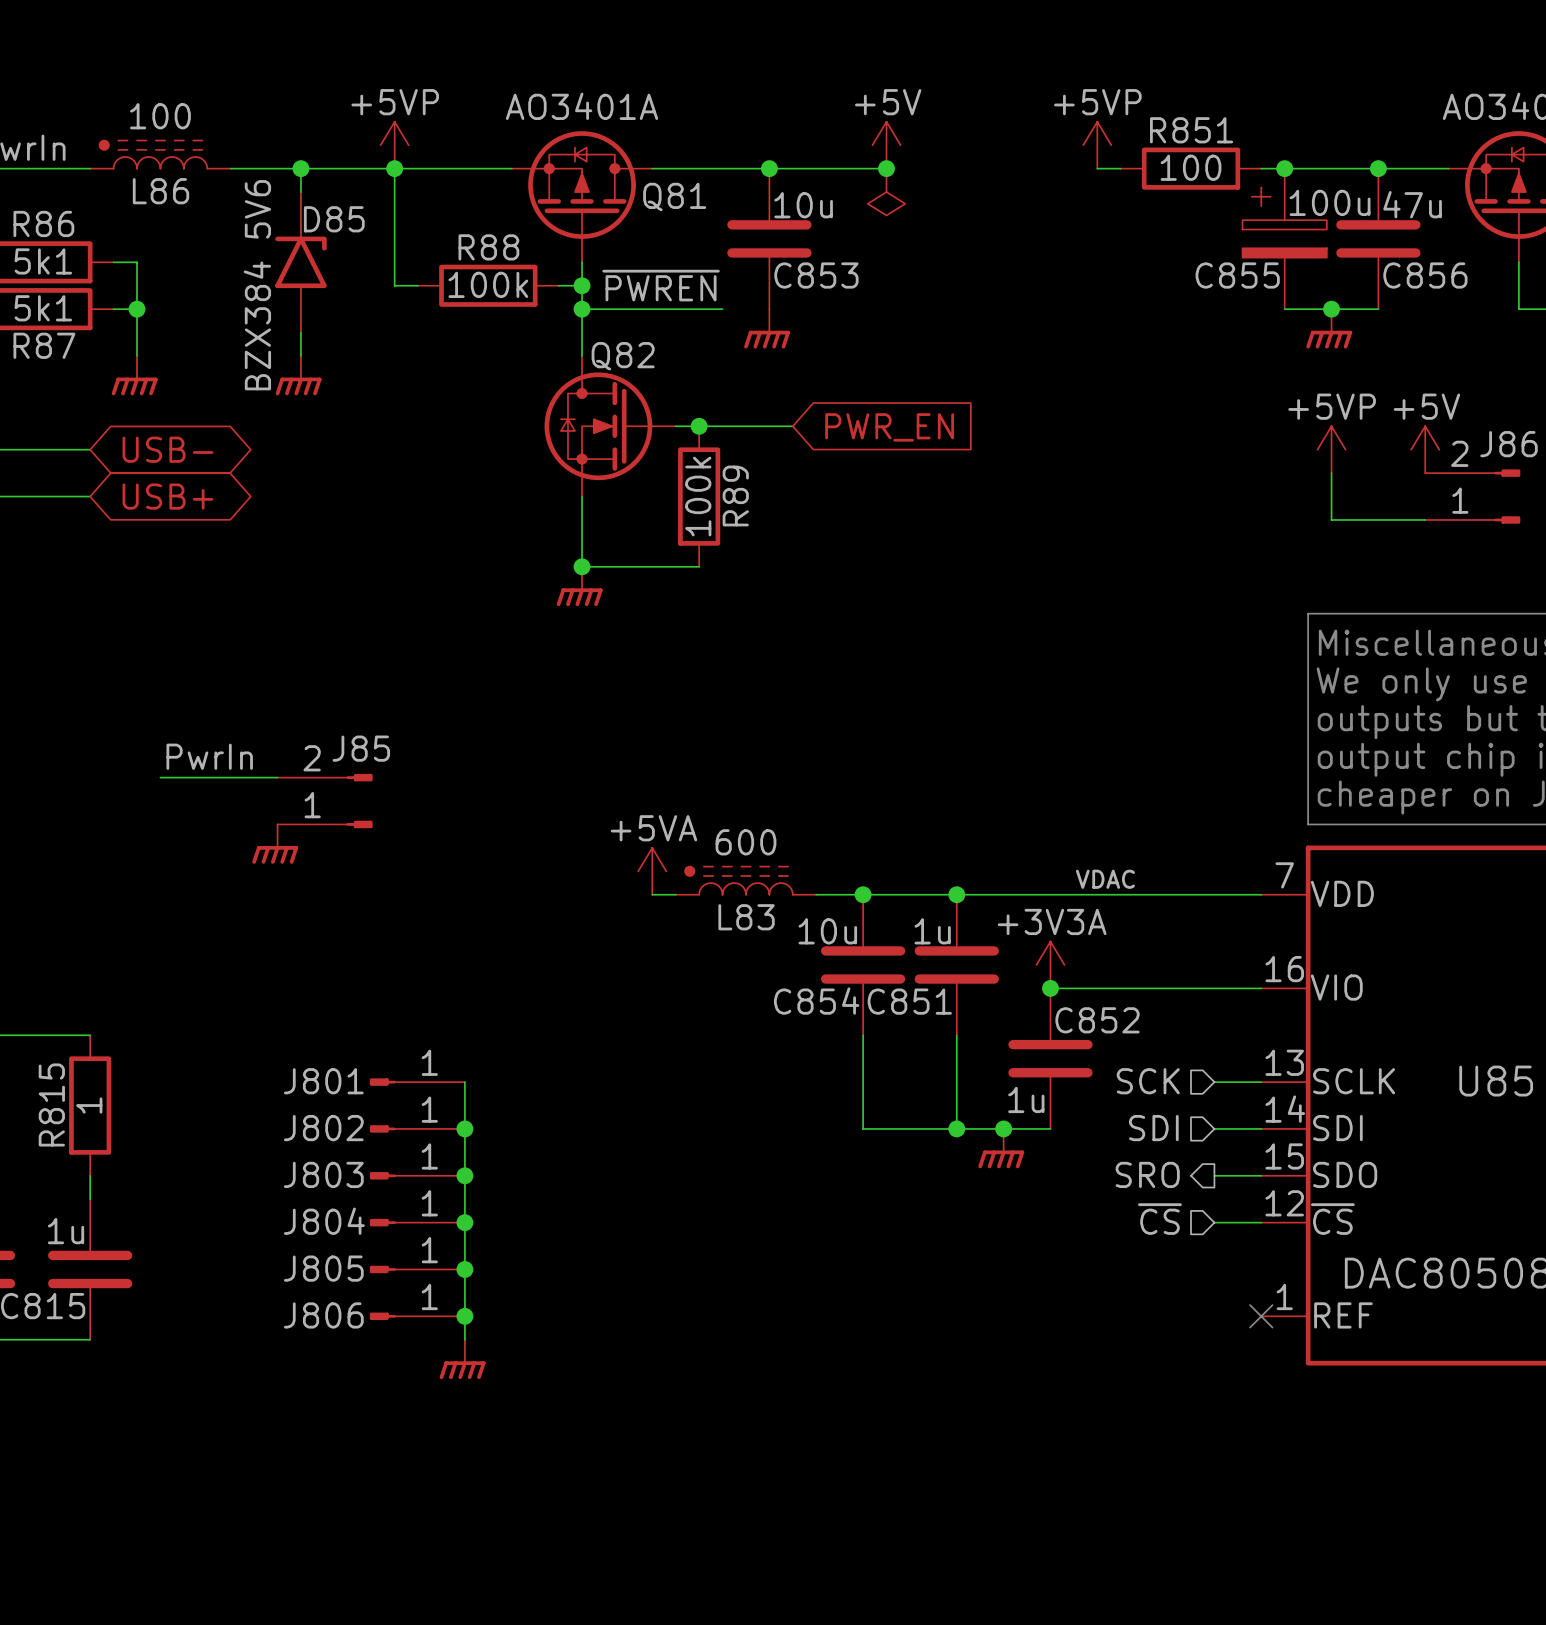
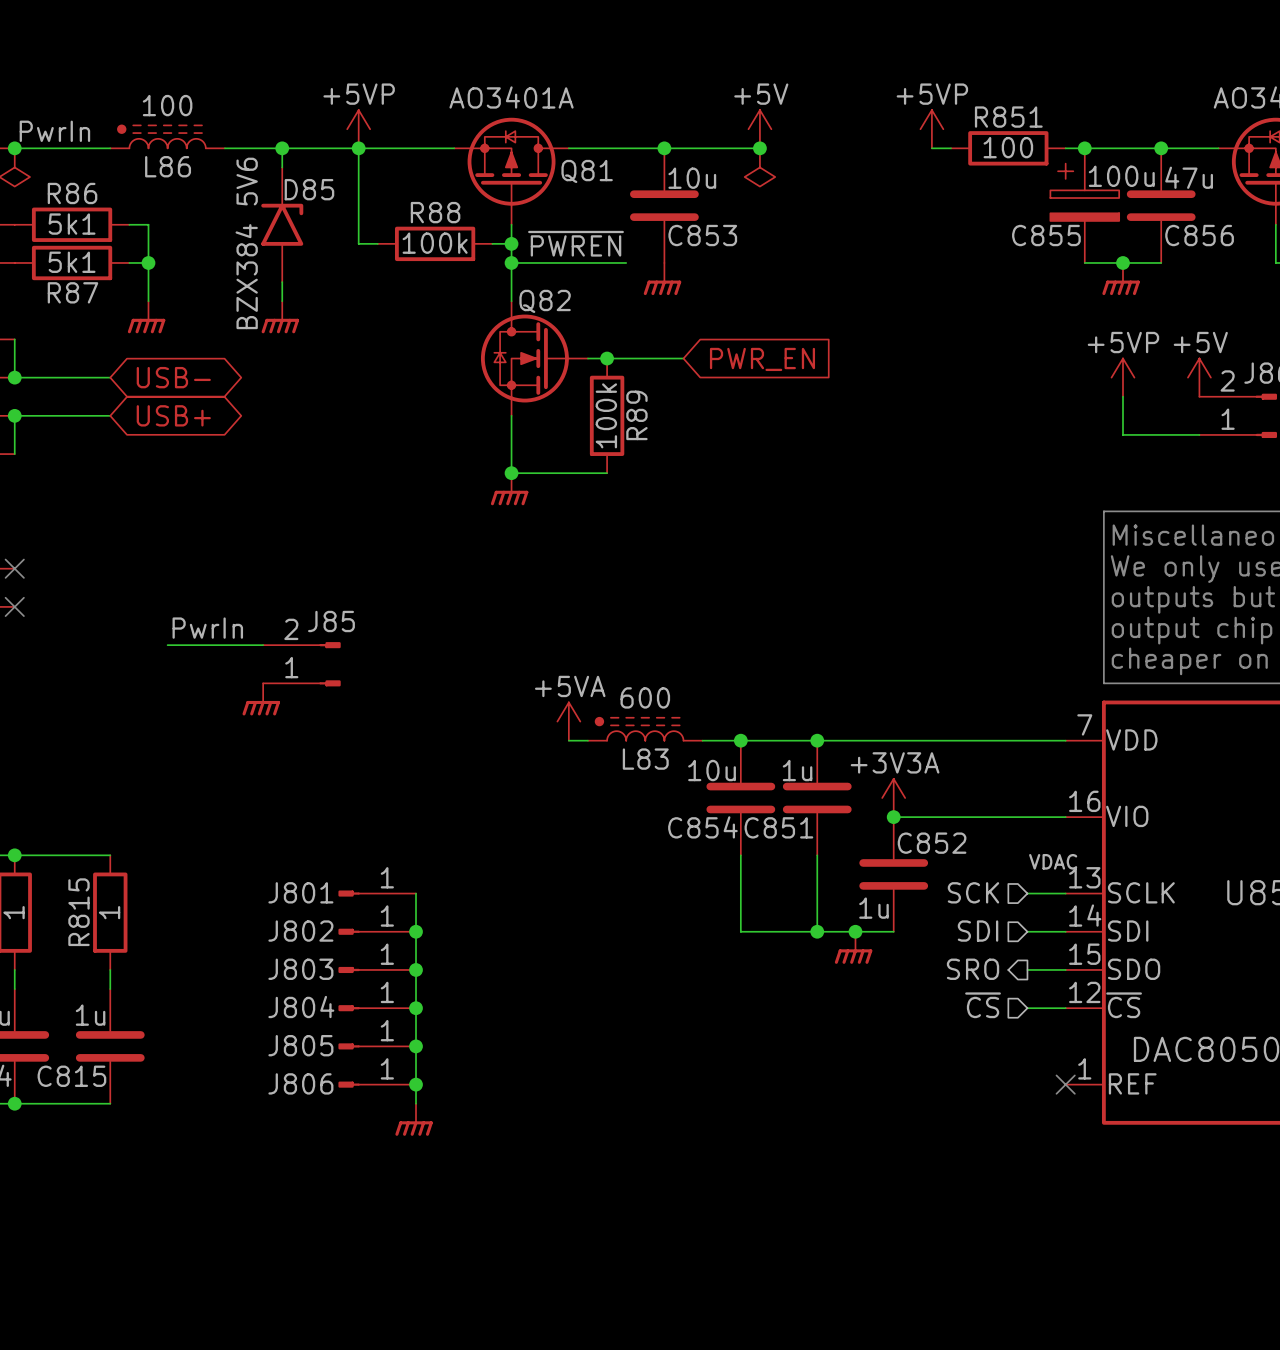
label position: VDAC (1105, 879) -> VDAC (1053, 861)

